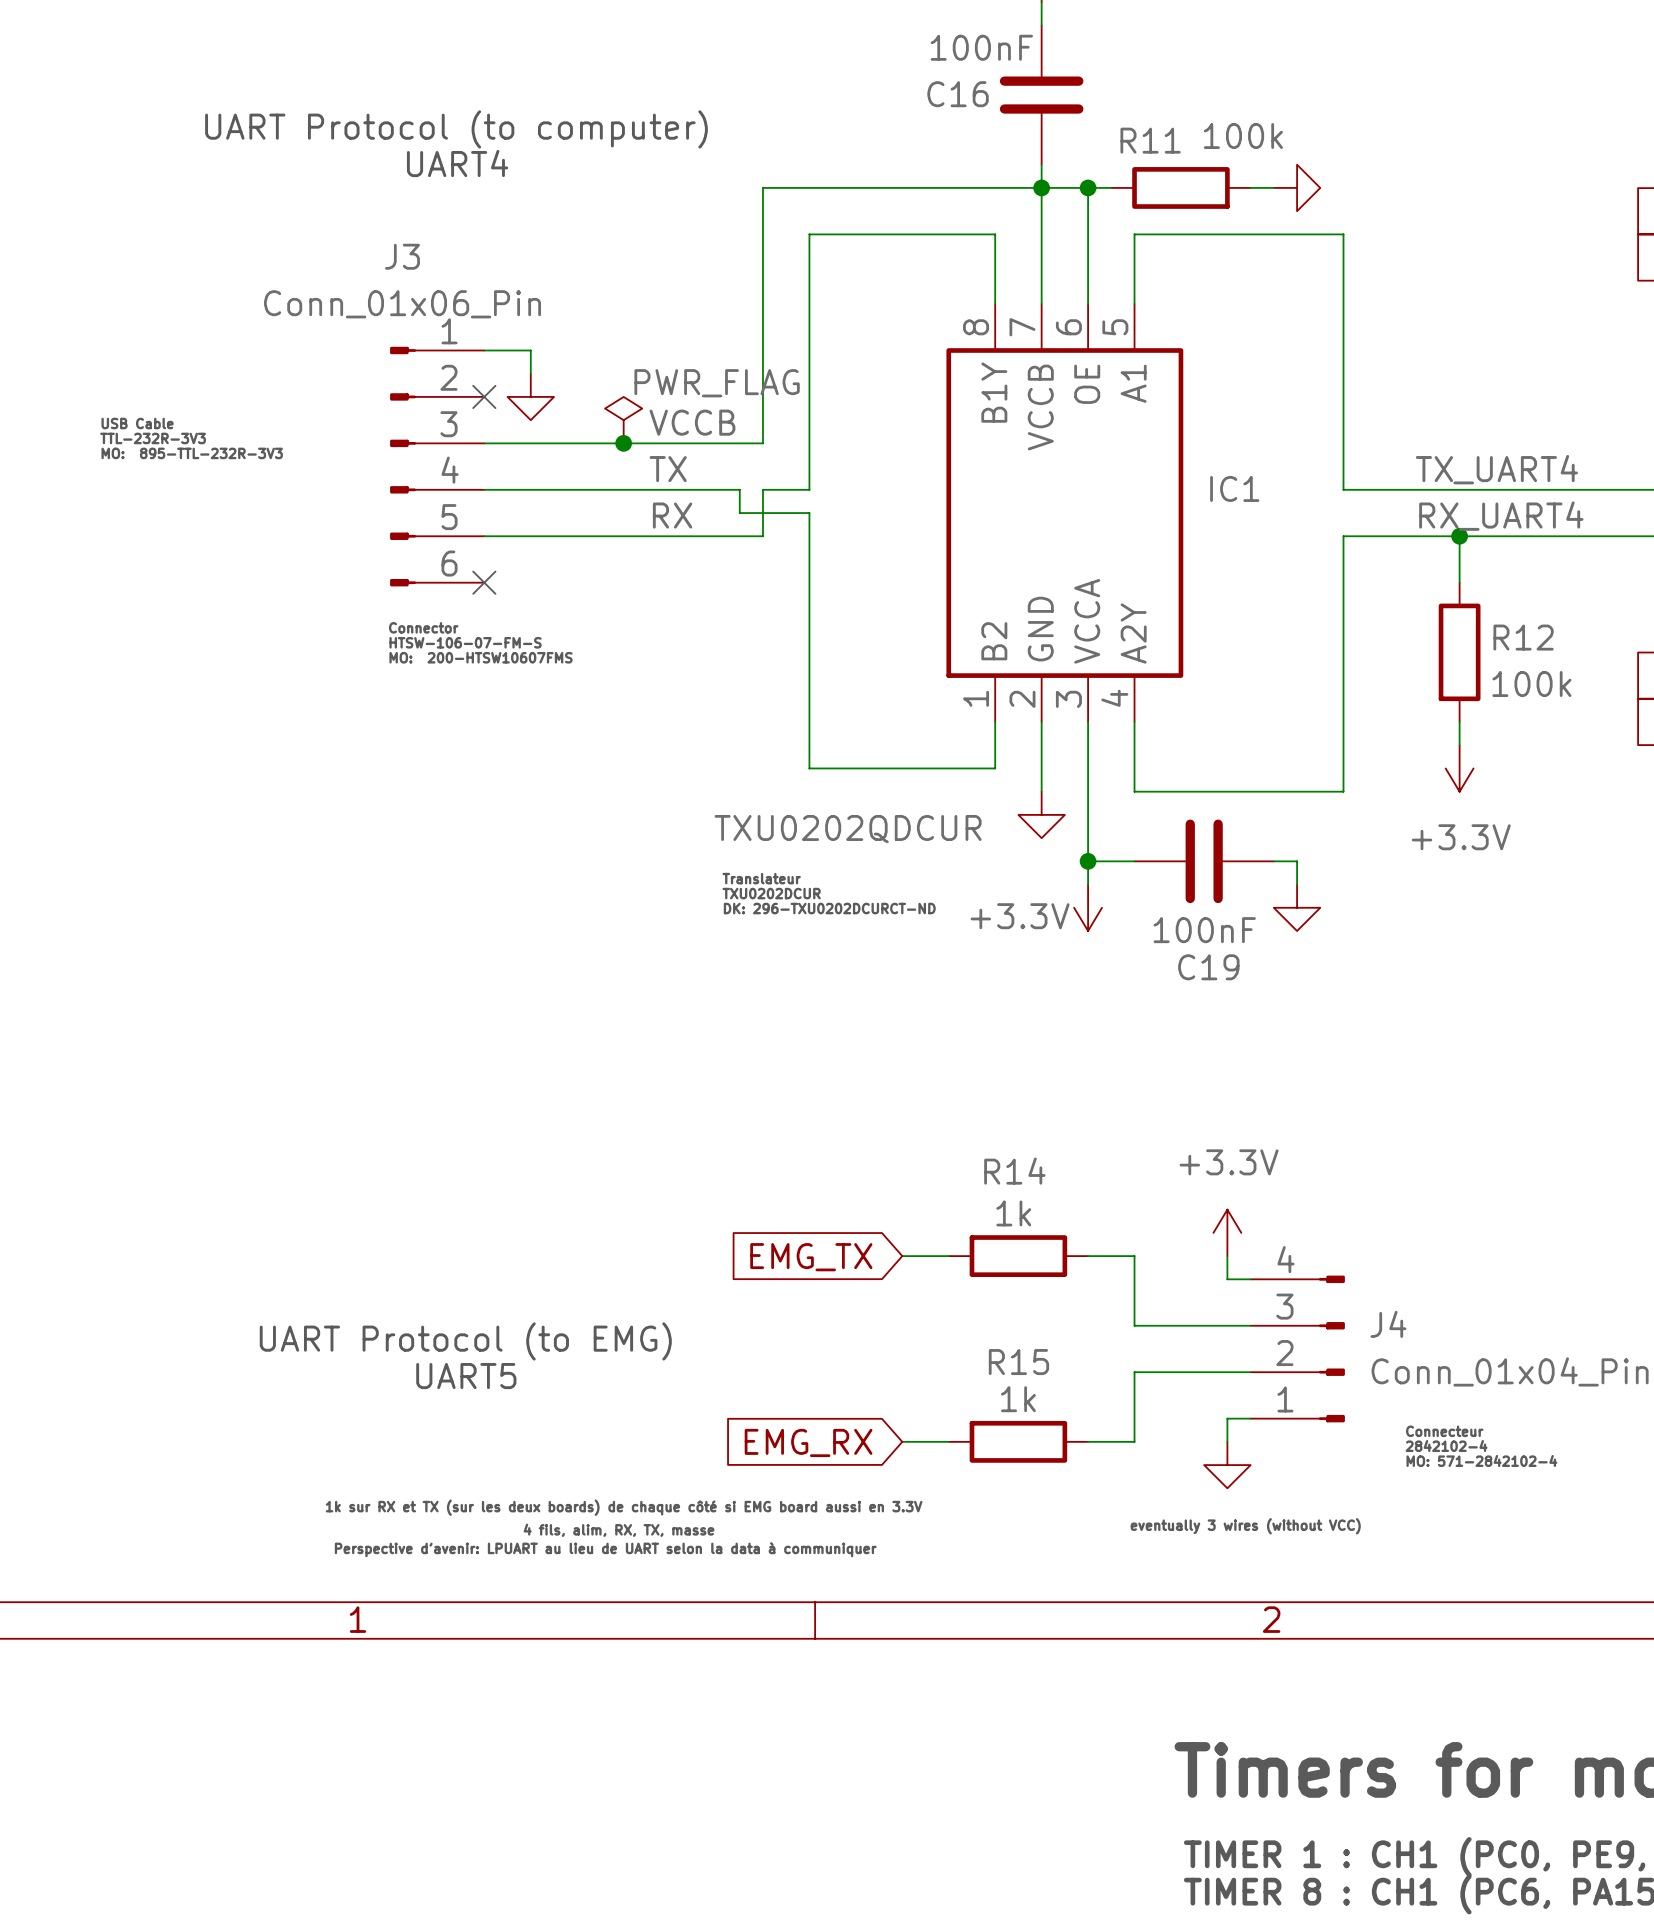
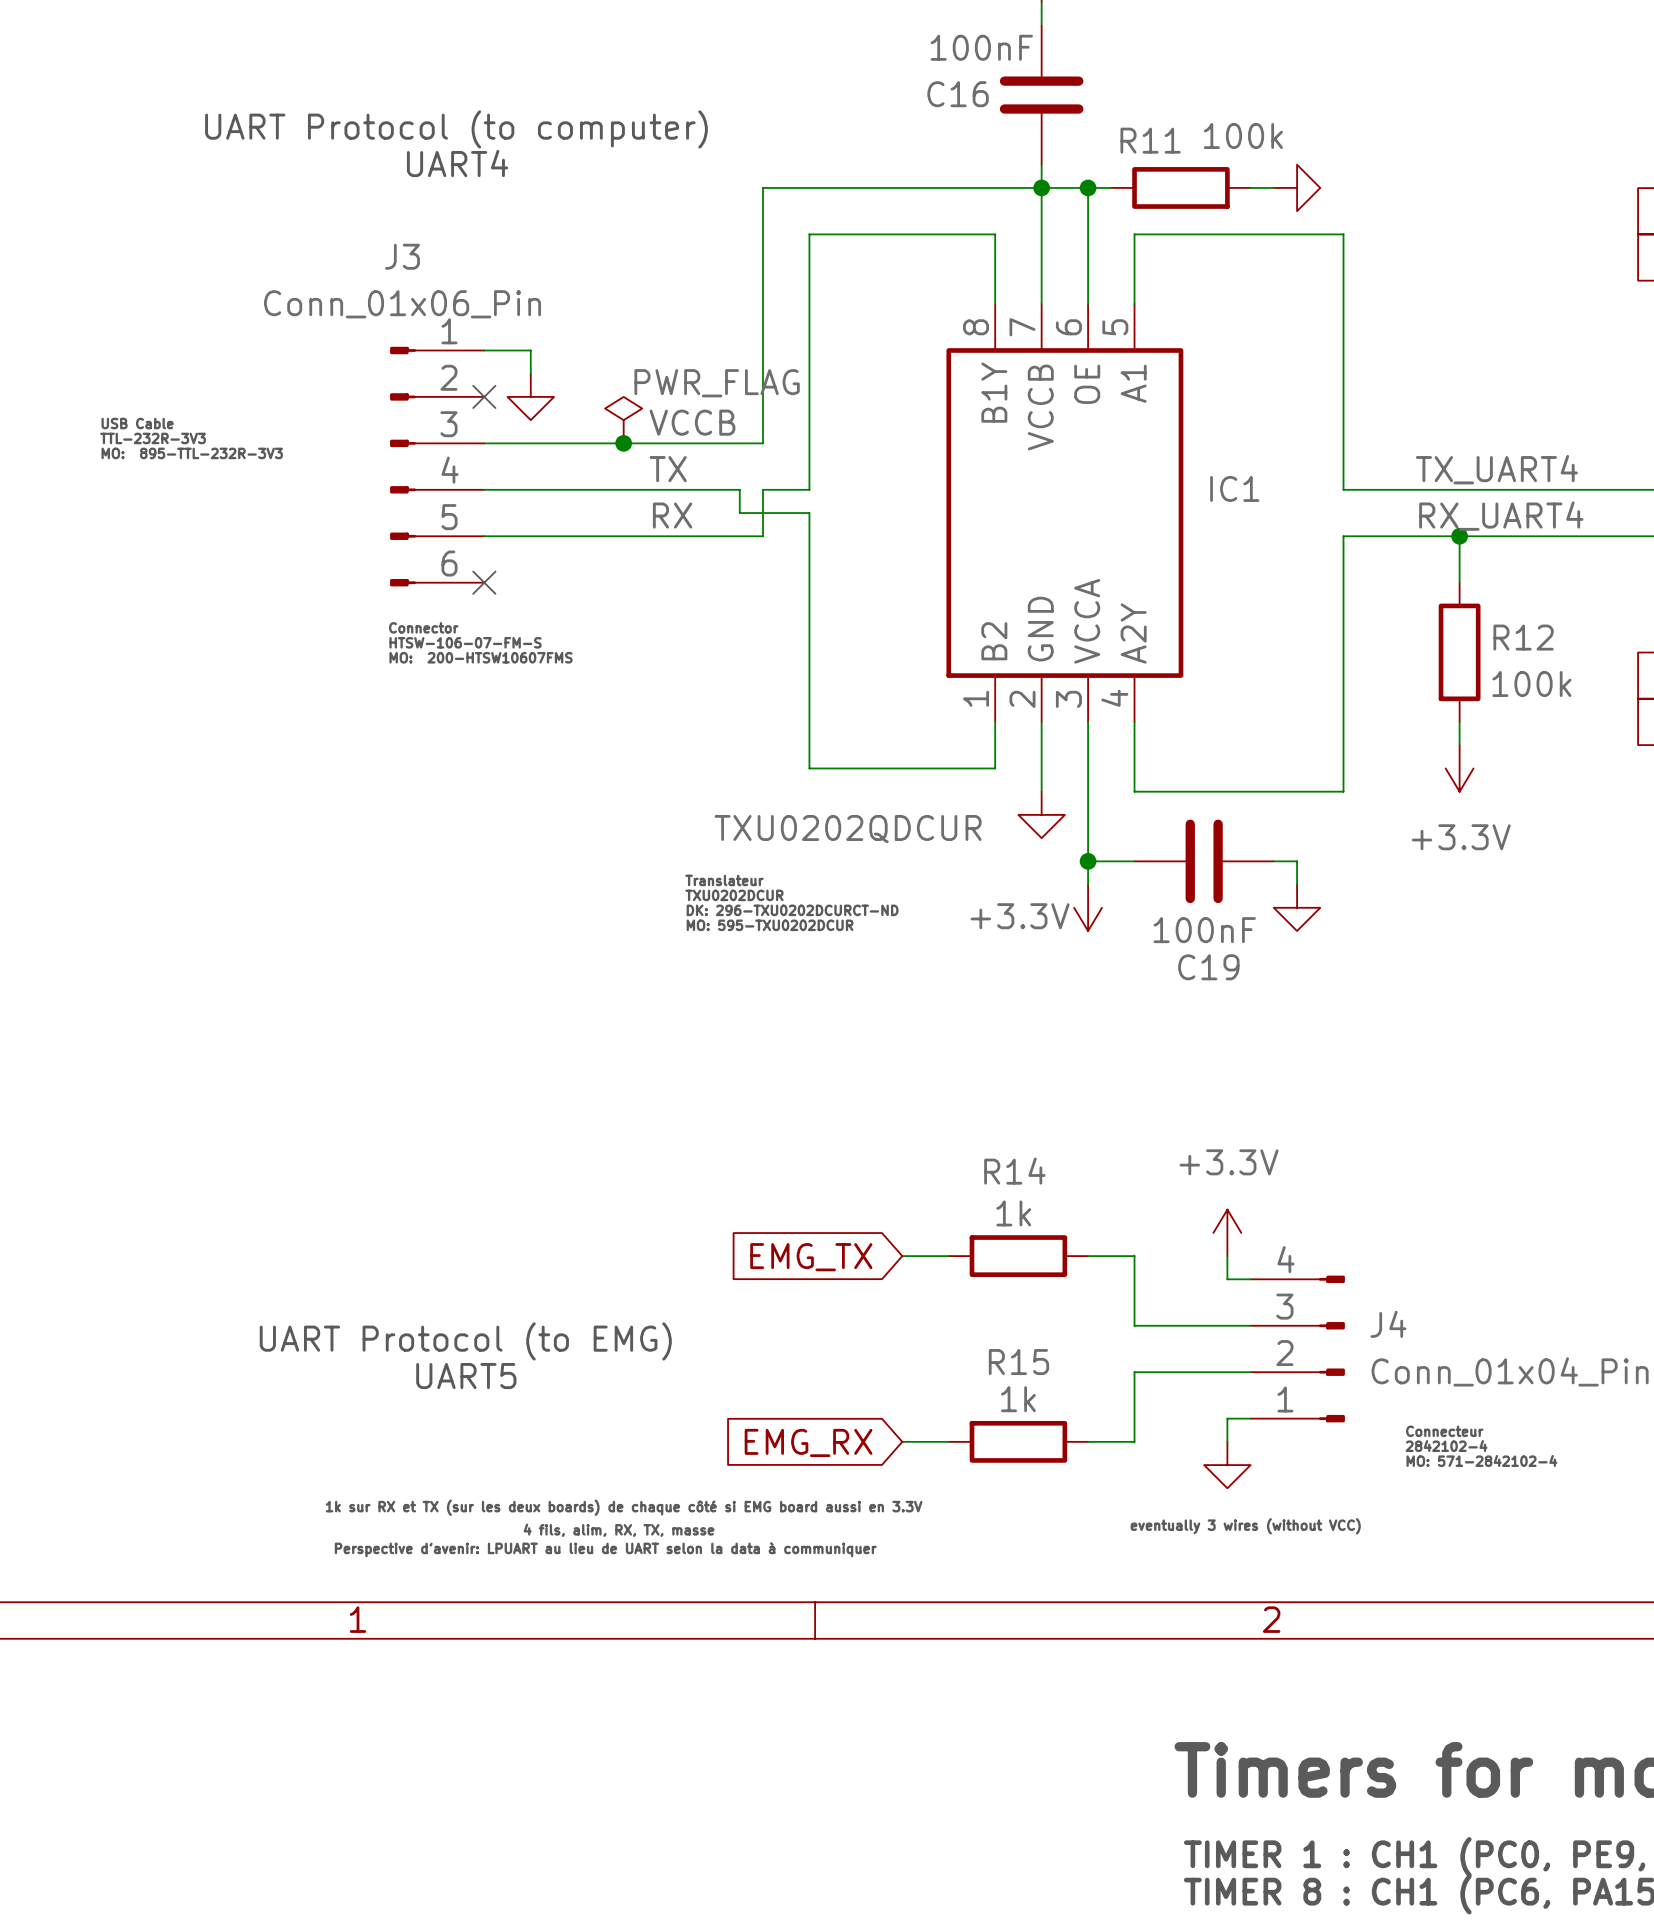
text position: Translateur (761, 878) -> Translateur (724, 880)
text position: TXU0202DCUR (771, 893) -> TXU0202DCUR (734, 895)
text position: DK: 296-TXU0202DCURCT-ND (829, 908) -> DK: 296-TXU0202DCURCT-ND (792, 910)
text: none -> MO: 595-TXU0202DCUR (770, 925)

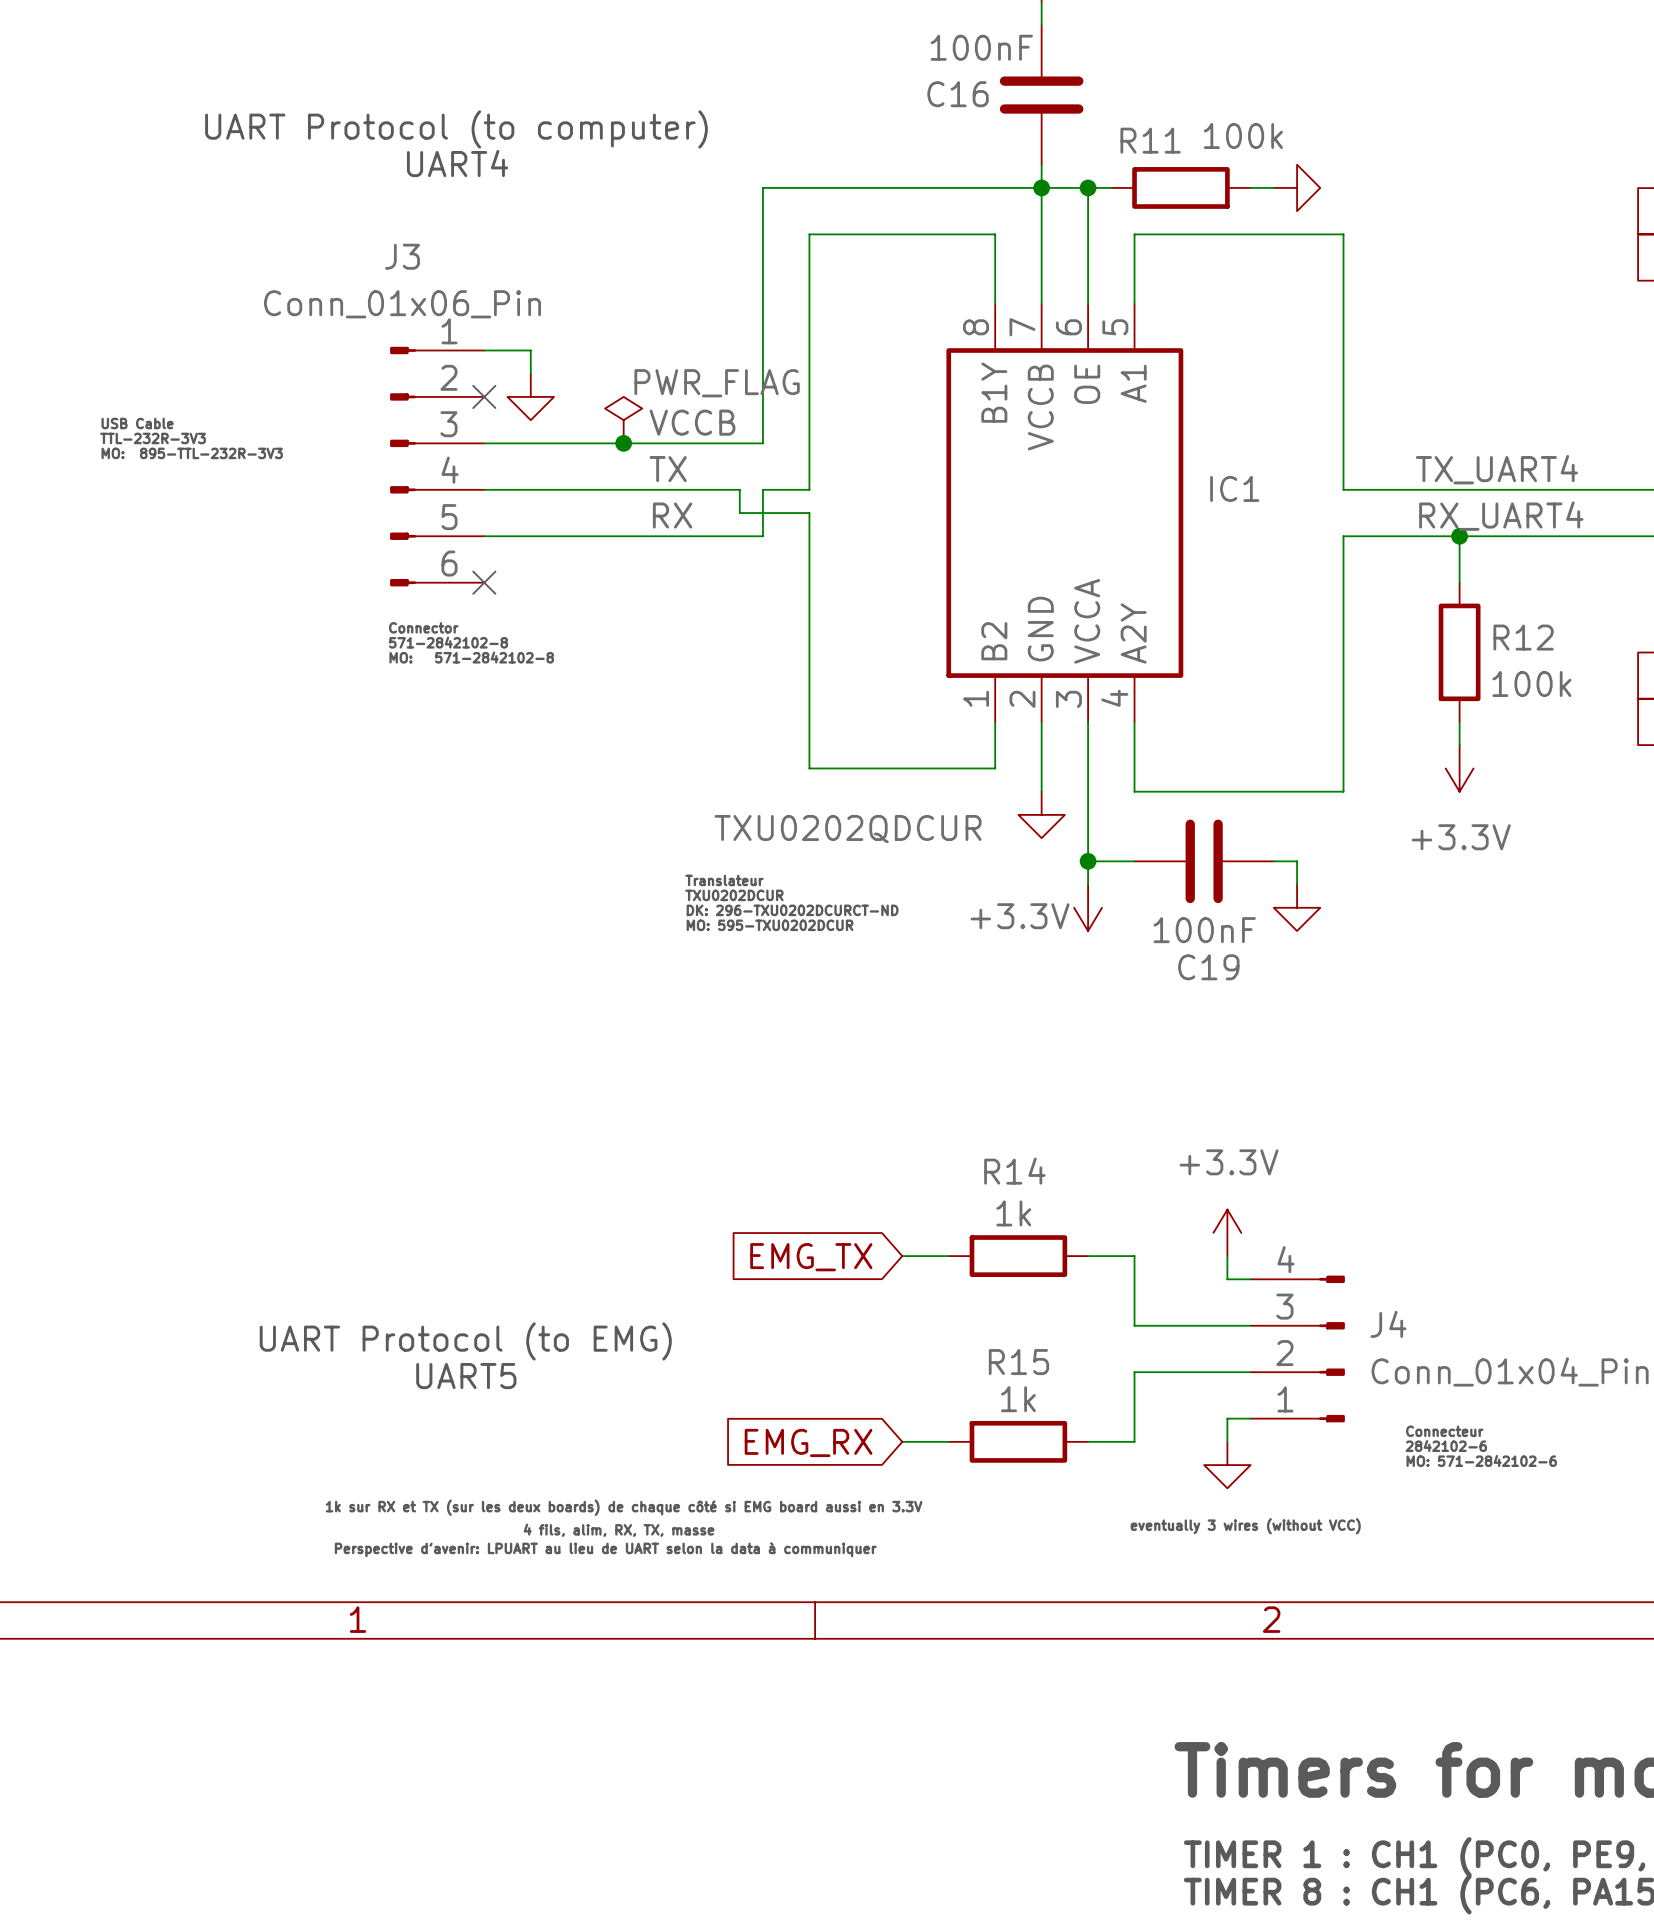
text: HTSW-106-07-FM-S (465, 642) -> 571-2842102-8 (448, 642)
text: MO: 200-HTSW10607FMS (481, 657) -> MO: 571-2842102-8 (471, 657)
text: 2842102-4 (1446, 1446) -> 2842102-6 (1446, 1446)
text: MO: 571-2842102-4 (1481, 1460) -> MO: 571-2842102-6 (1481, 1460)

